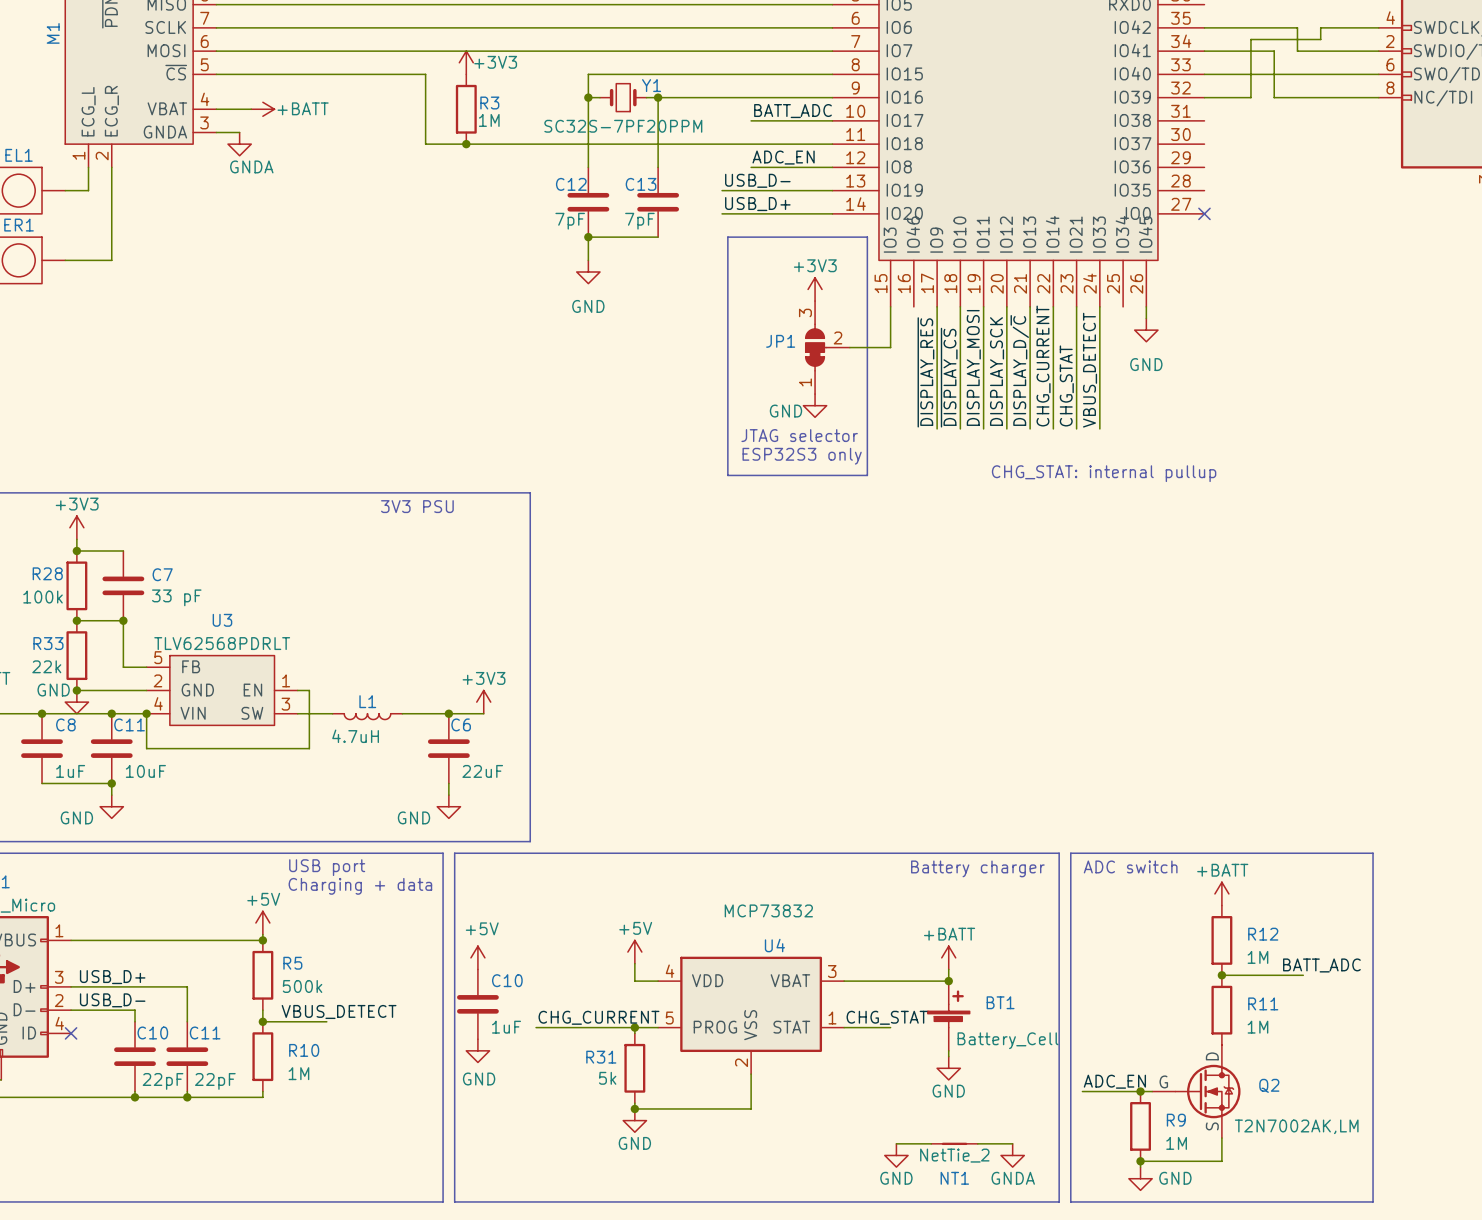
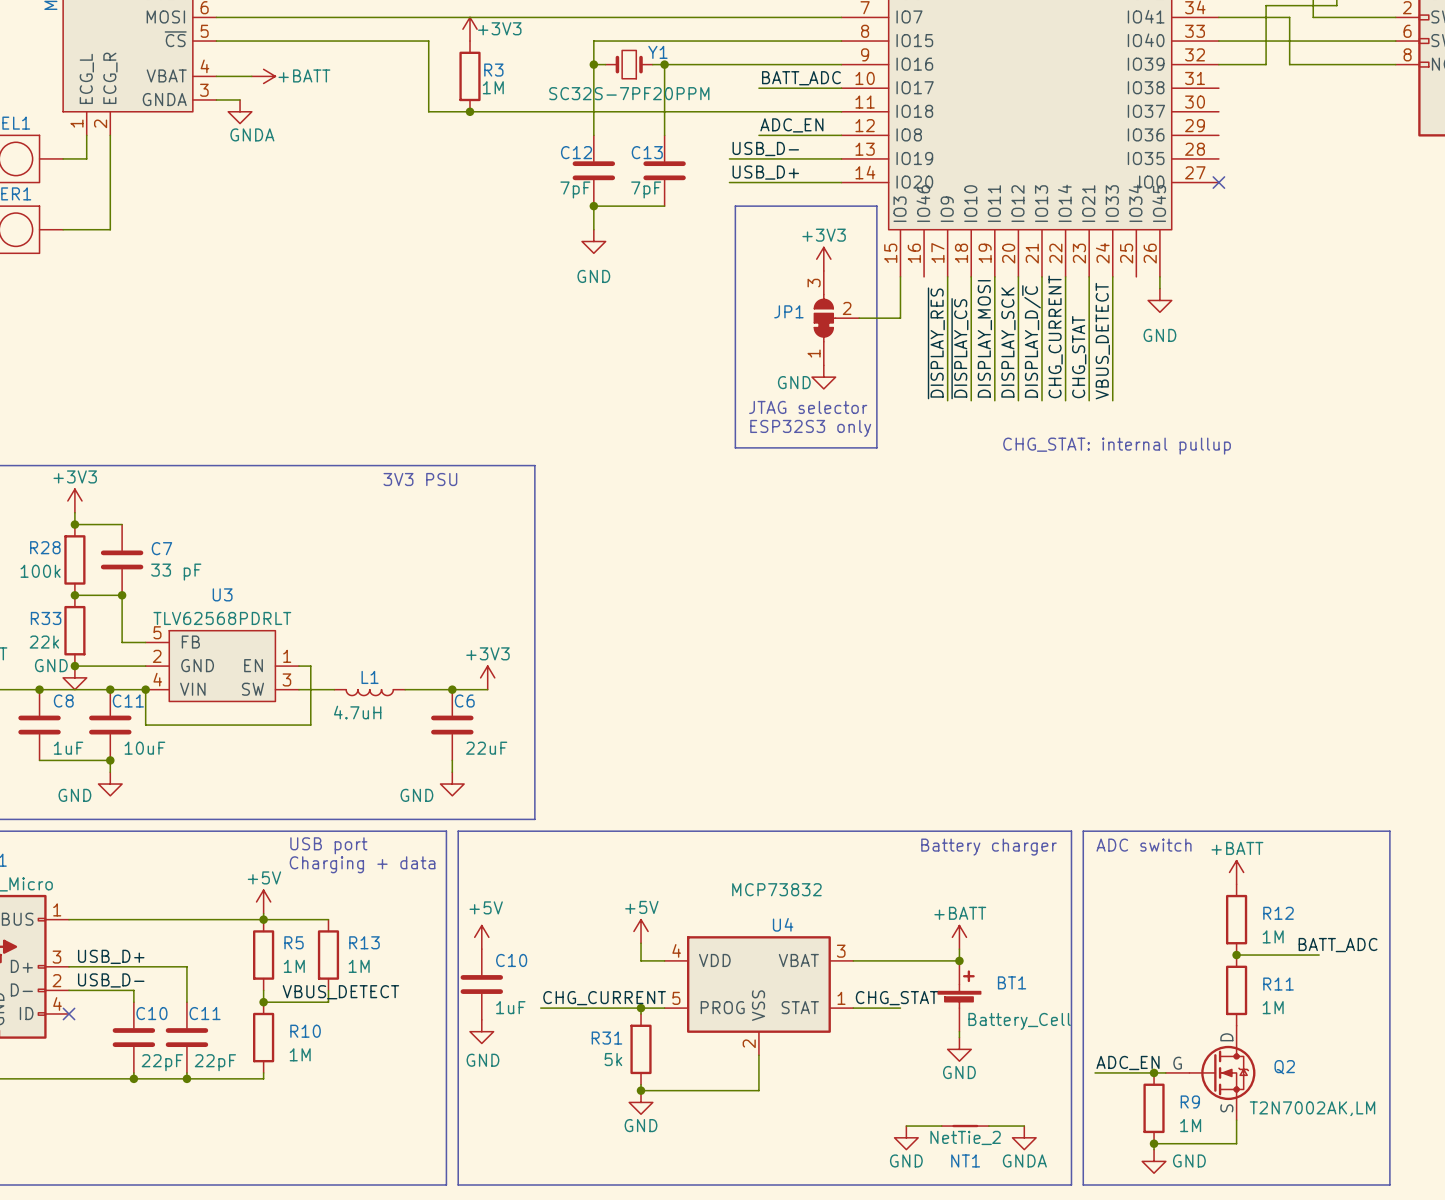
wire: none -> (263, 919) (328, 919)
R13: none -> 1M (328, 955)
R5 value: 500k (302, 986) -> 1M (294, 966)
wire: none -> (328, 990) (328, 1002)

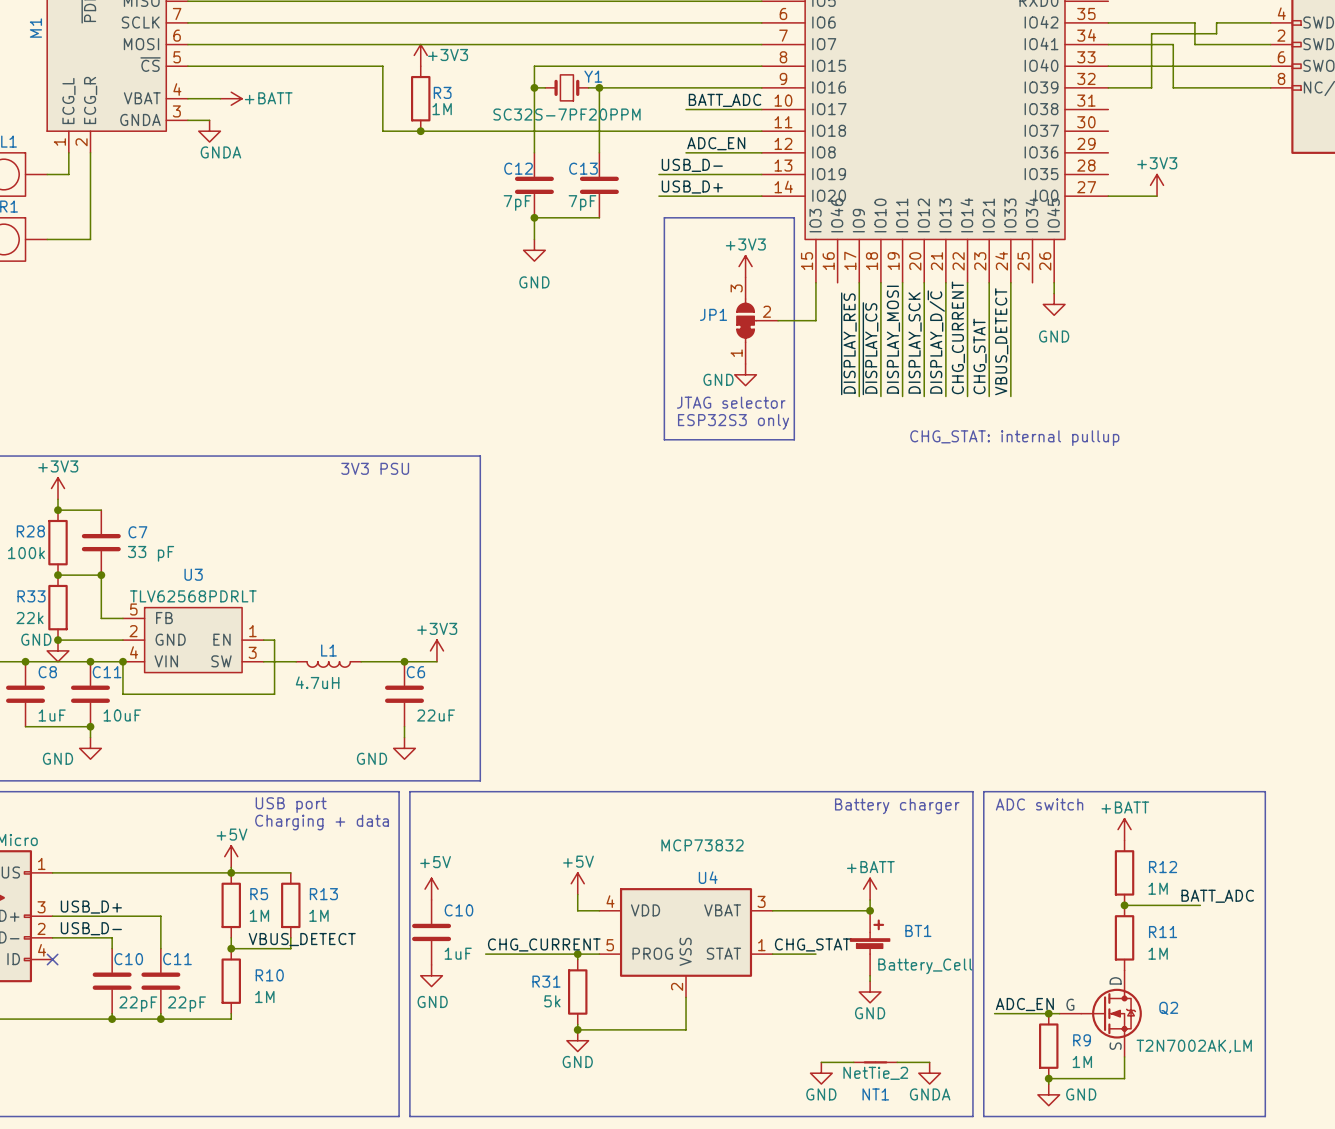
power symbol: none -> +3V3 (1157, 185)
wire: none -> (1108, 196) (1157, 196)
no-connect mark: (1218, 182) -> none

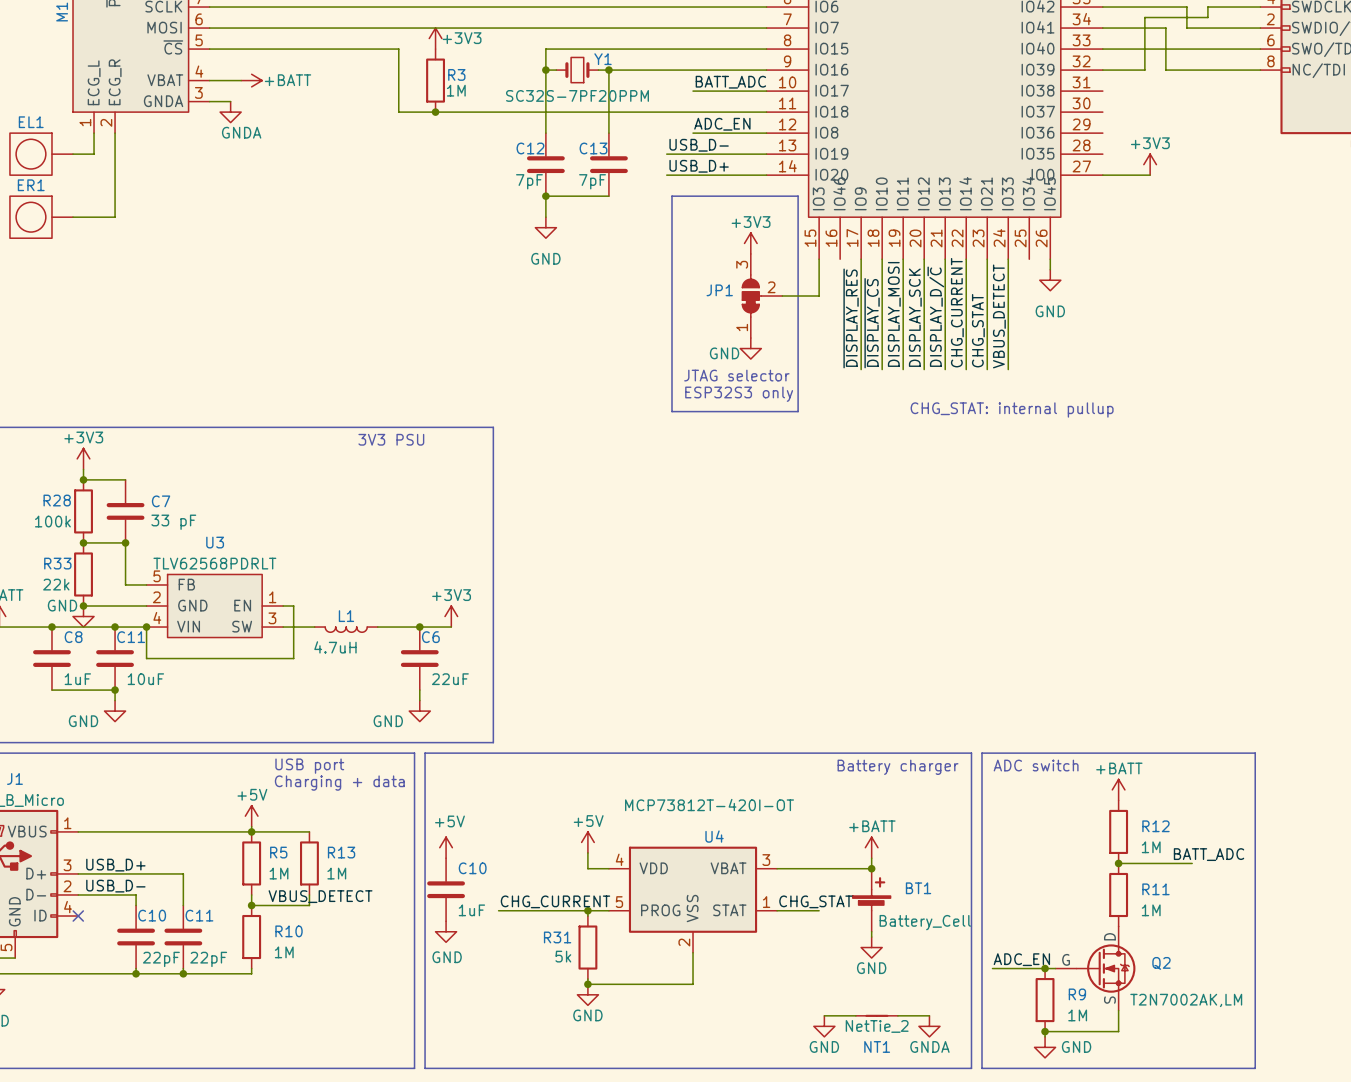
U4 value: MCP73832 (702, 845) -> MCP73812T-420I-OT (709, 805)

